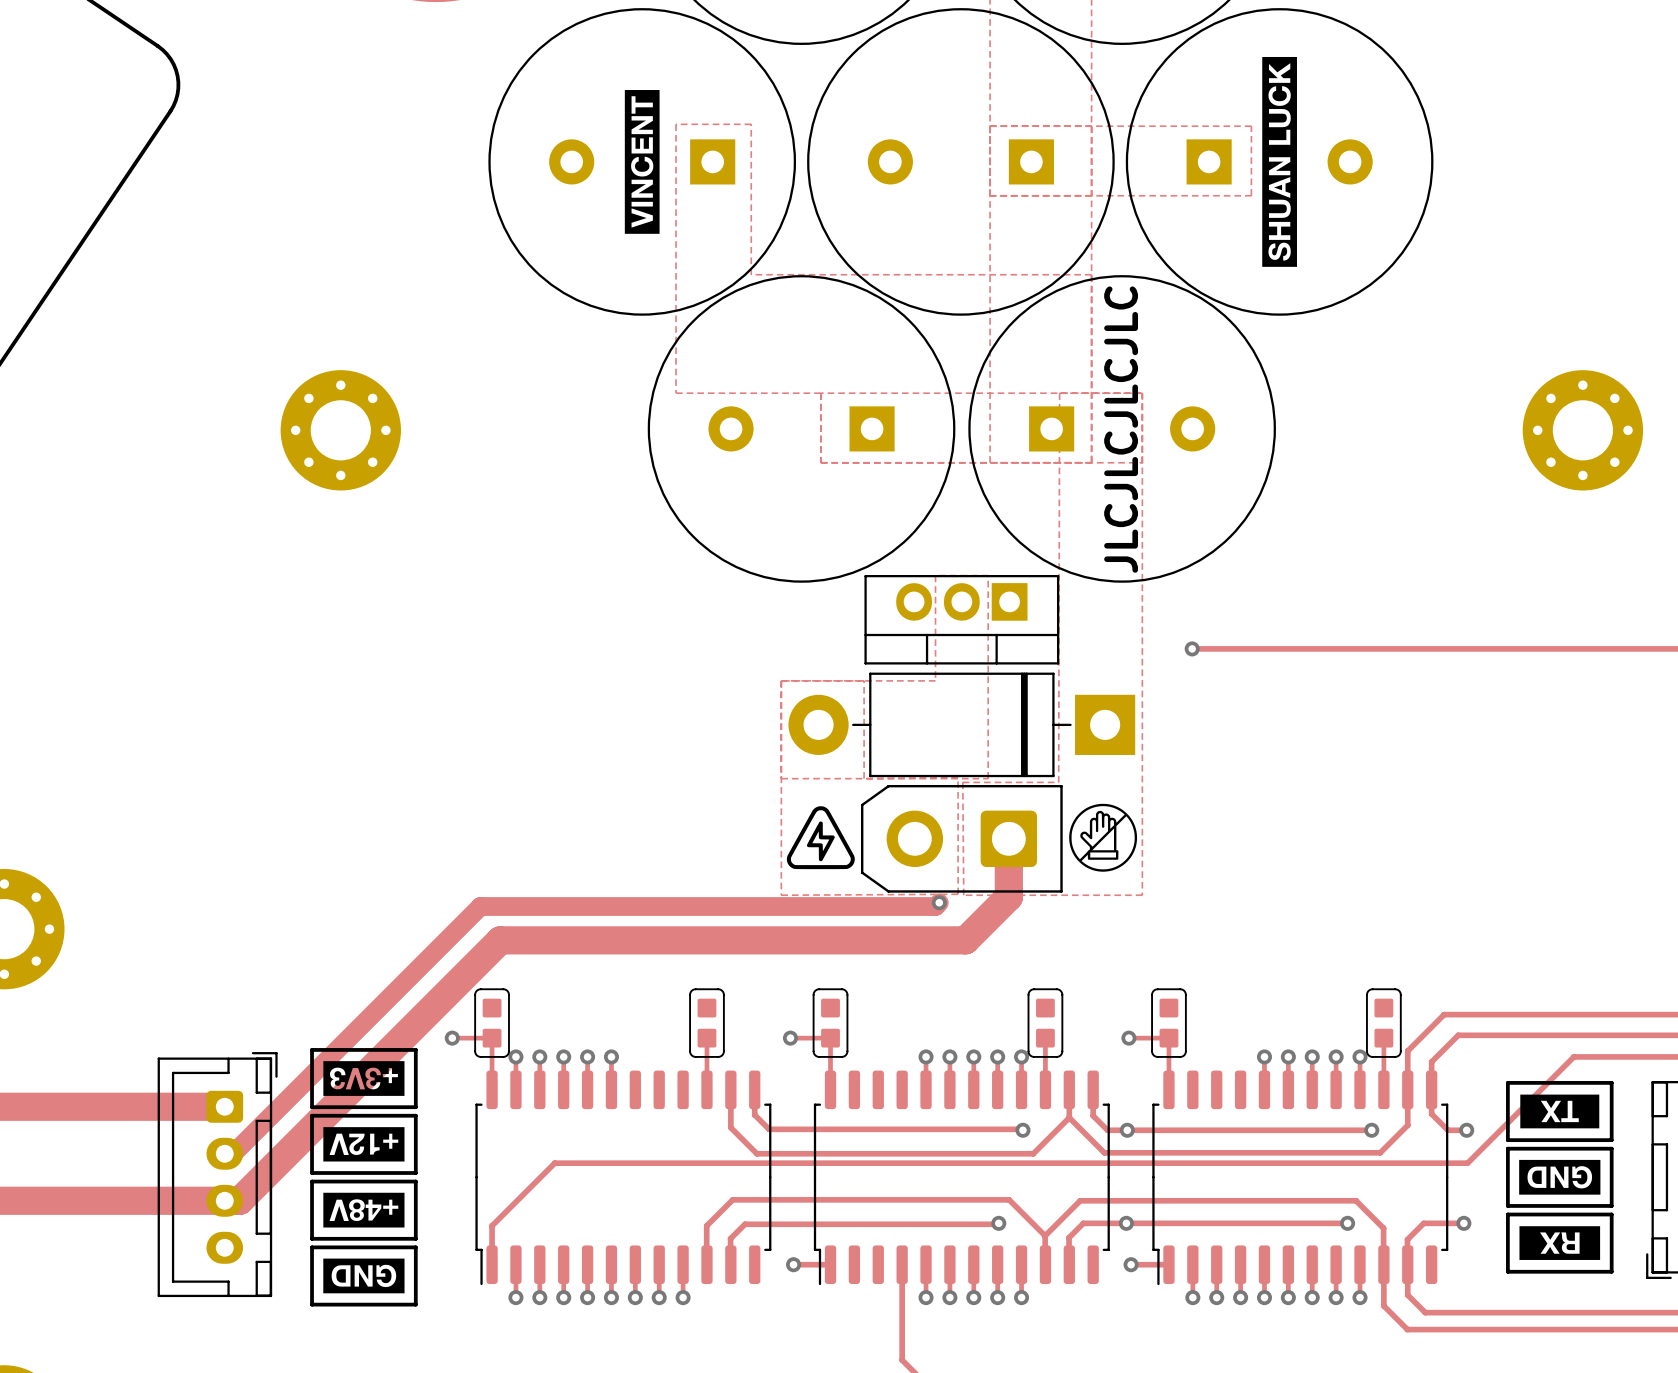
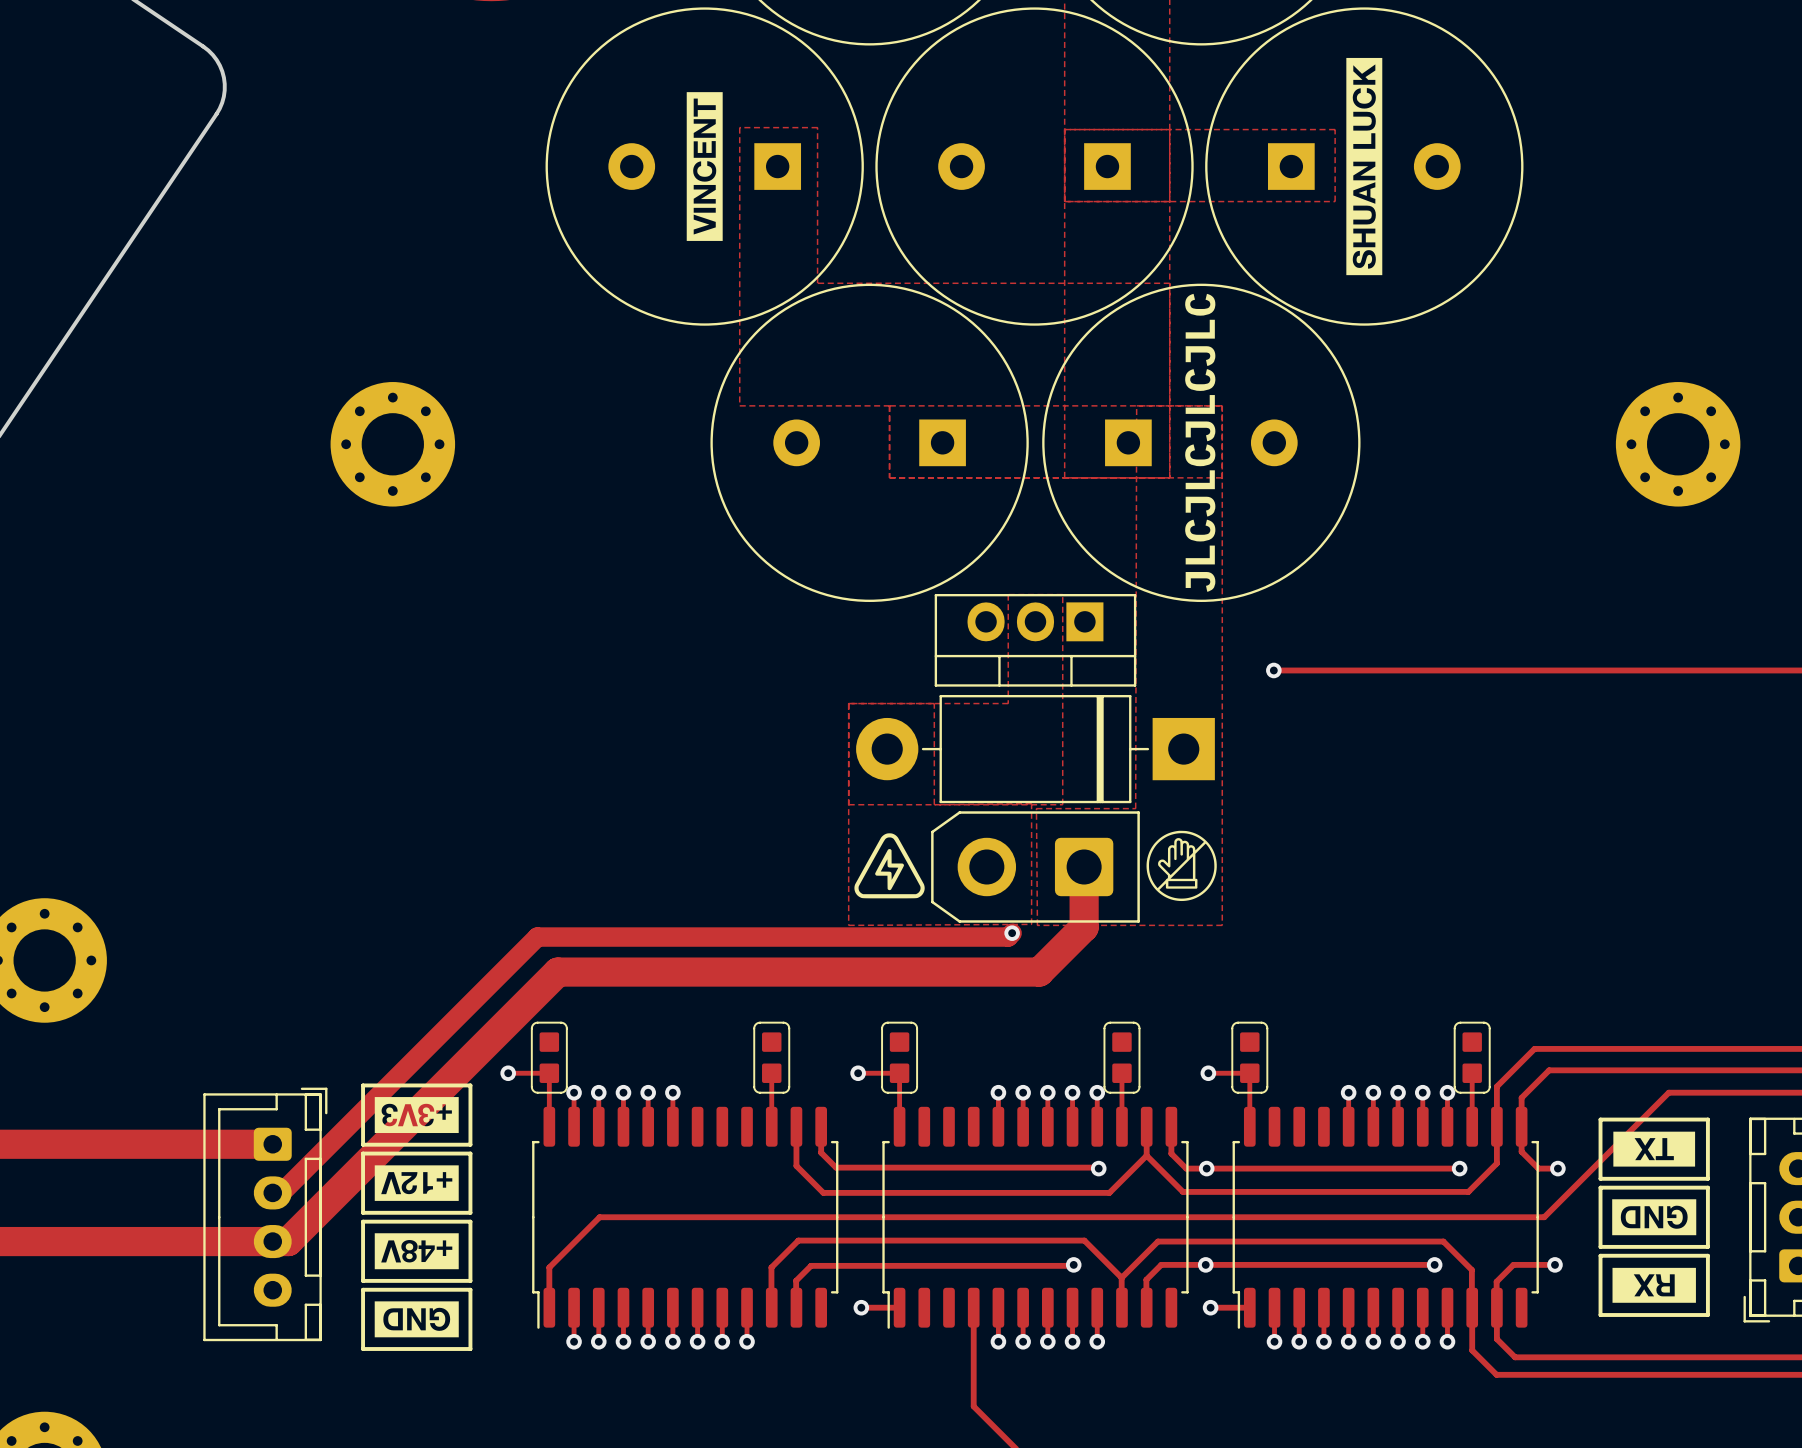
track: (1467, 1163) (554, 1163) (540, 1177) -> (1558, 1202) (1544, 1217) (599, 1217)

